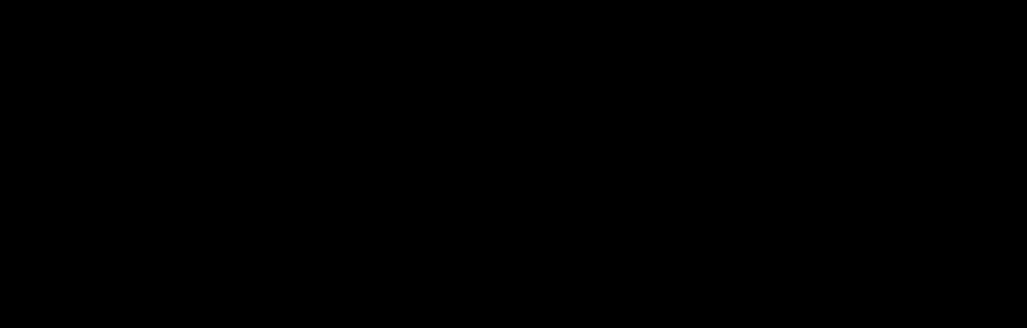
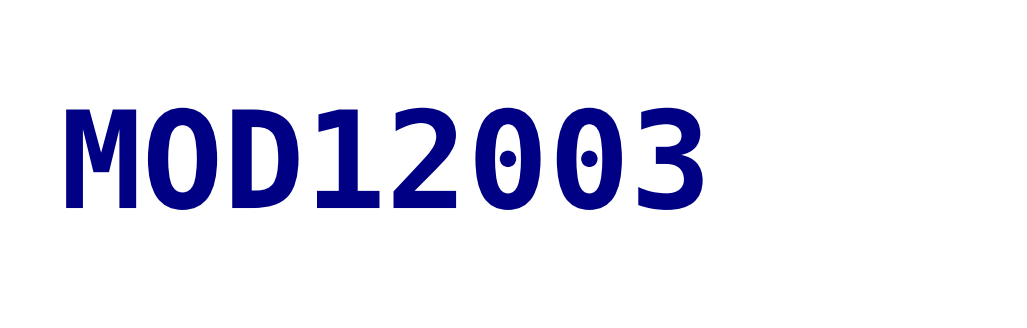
text: none -> MOD12003 (384, 158)

